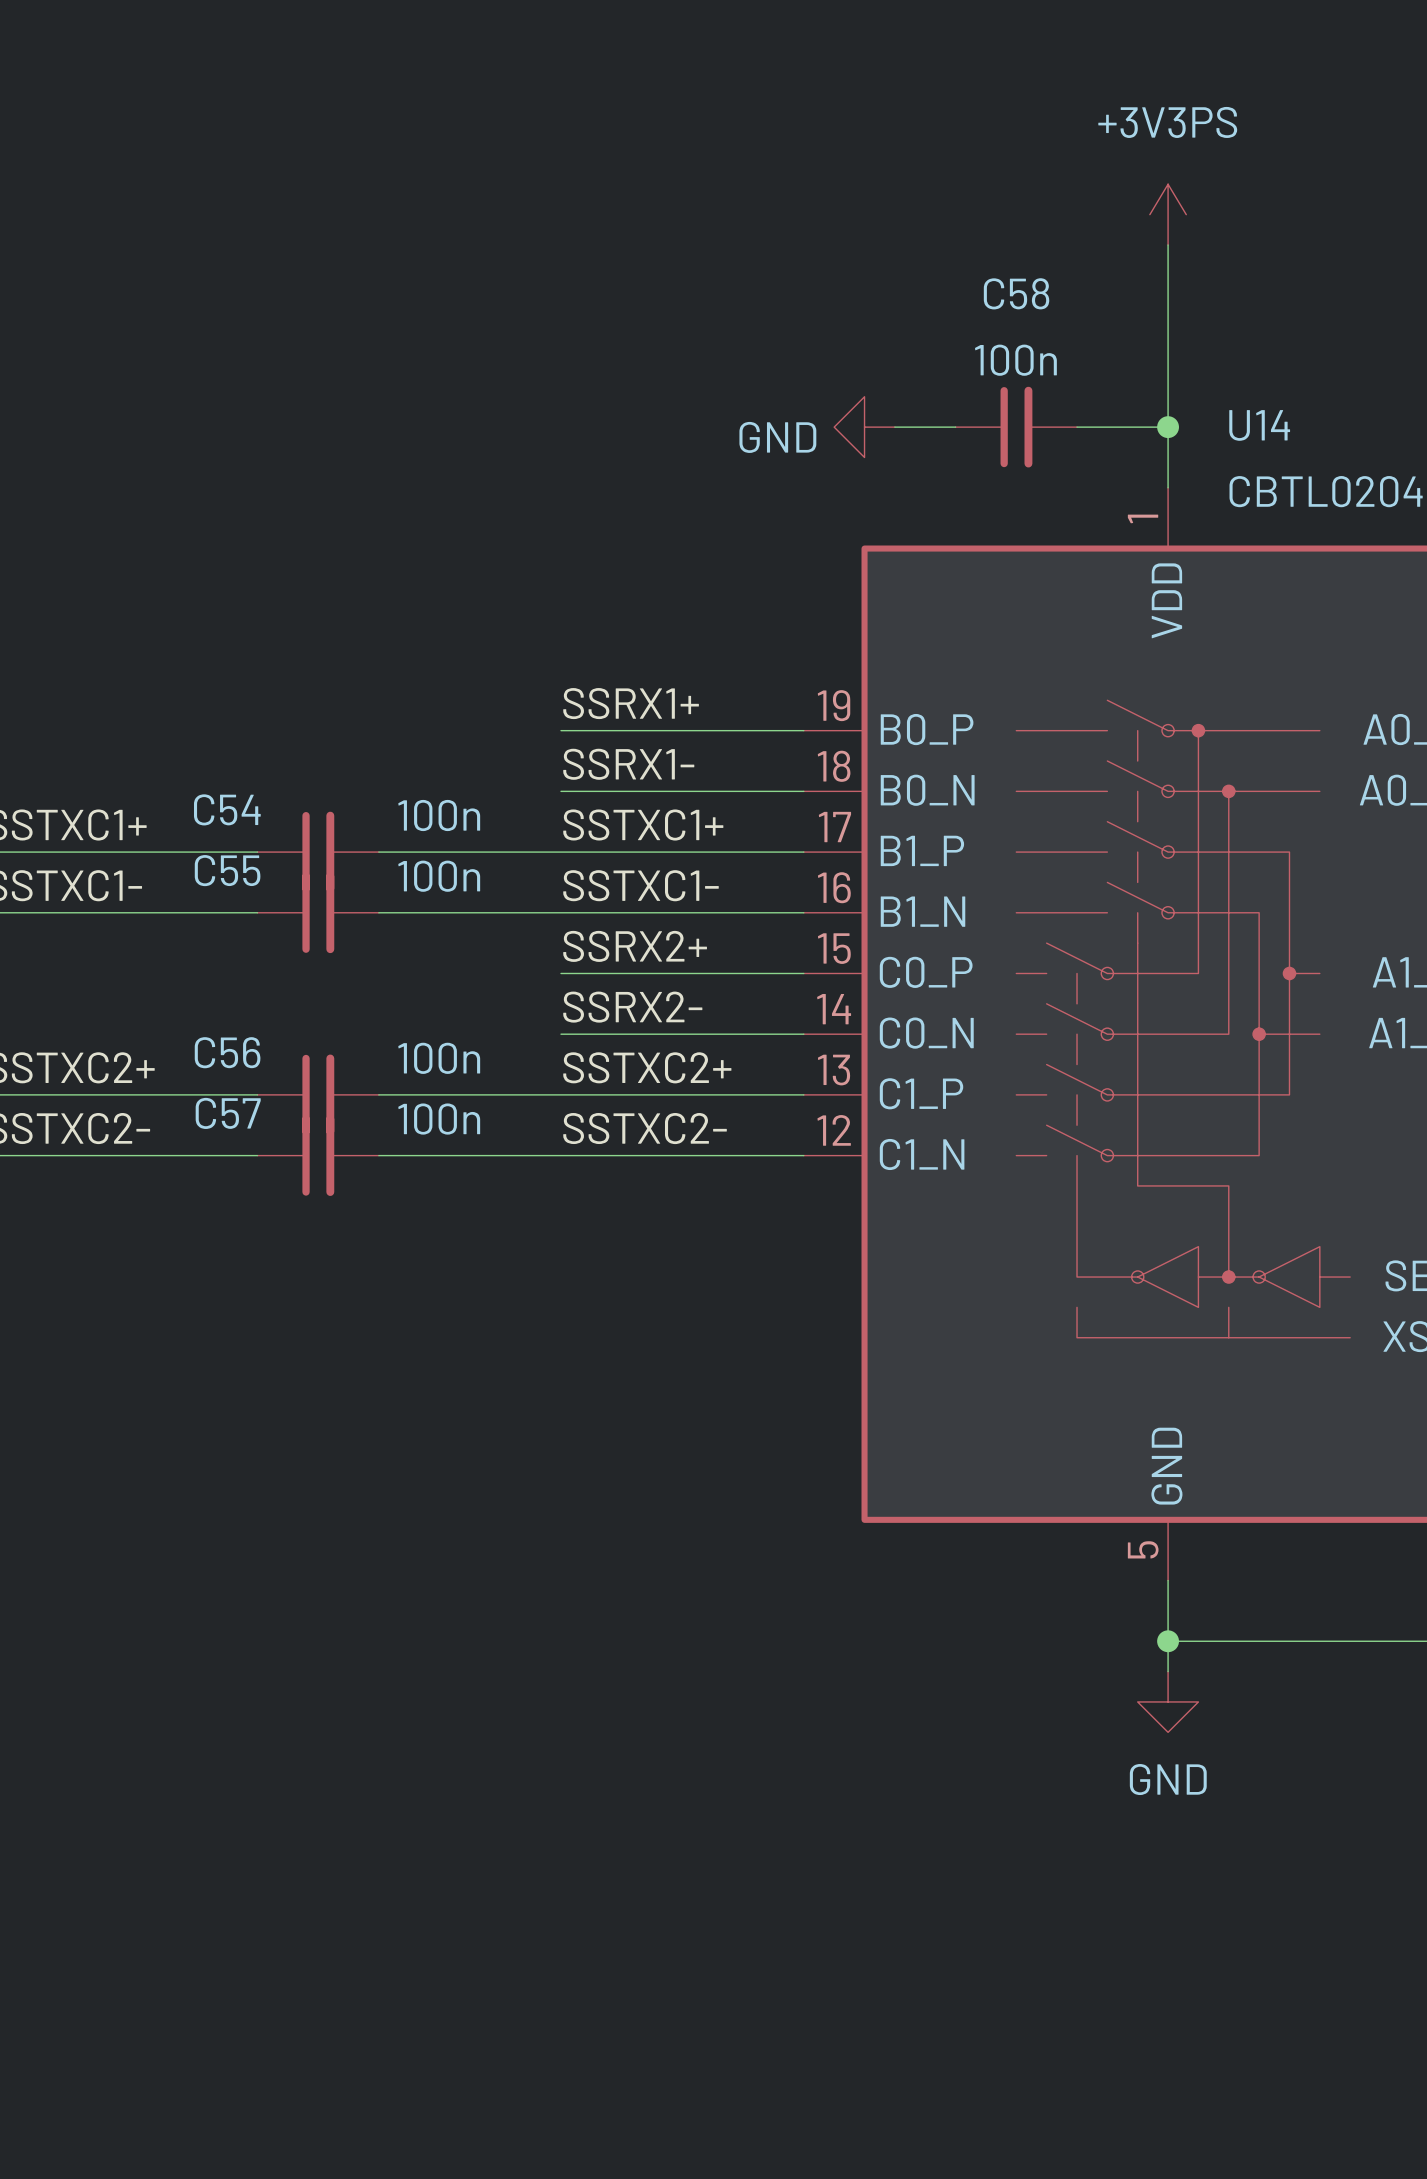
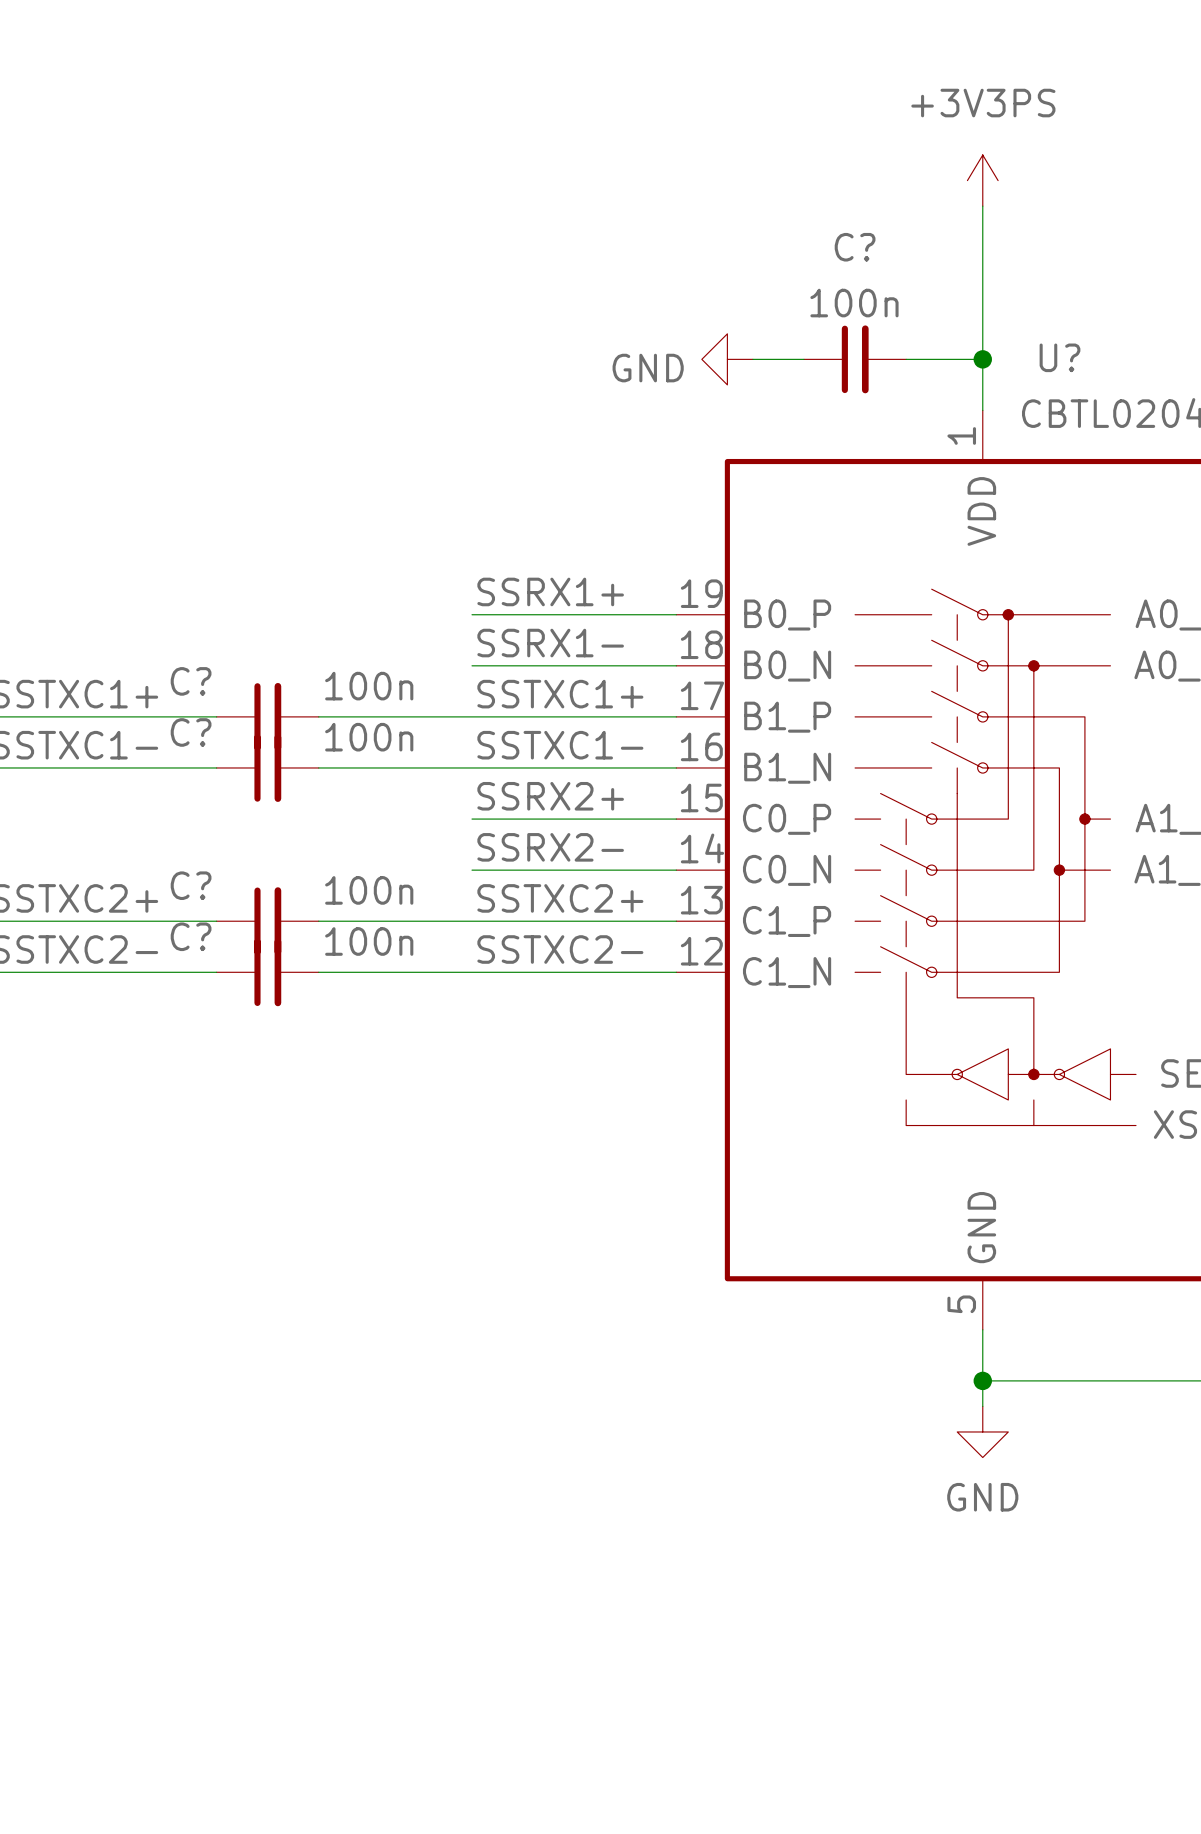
C58 name: C58 (1016, 293) -> C? (855, 247)
U14 name: U14 (1259, 425) -> U? (1060, 357)
C54 name: C54 (227, 809) -> C? (191, 681)
C55 name: C55 (227, 870) -> C? (191, 732)
C56 name: C56 (227, 1052) -> C? (191, 885)
C57 name: C57 (228, 1113) -> C? (191, 936)

